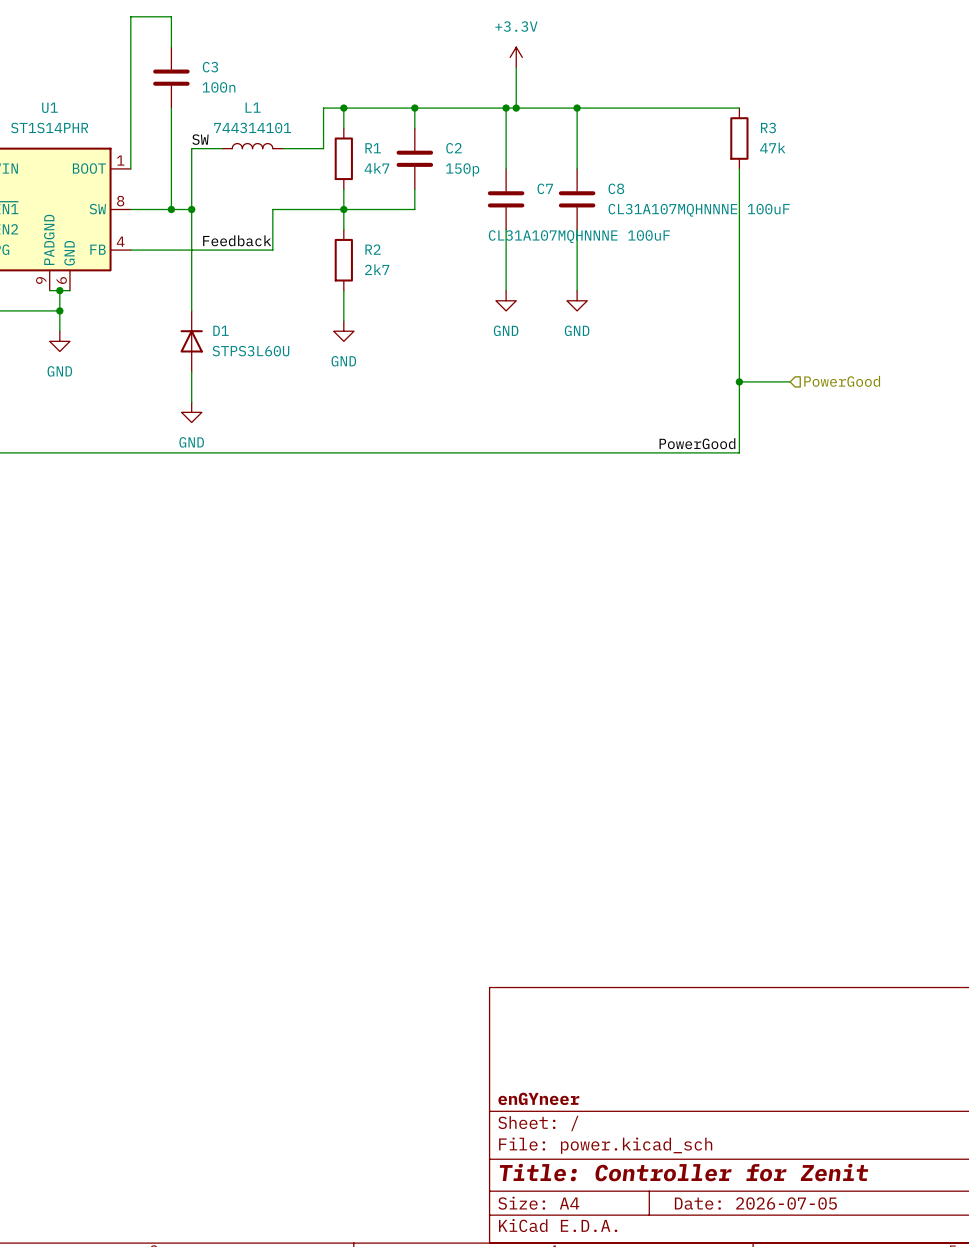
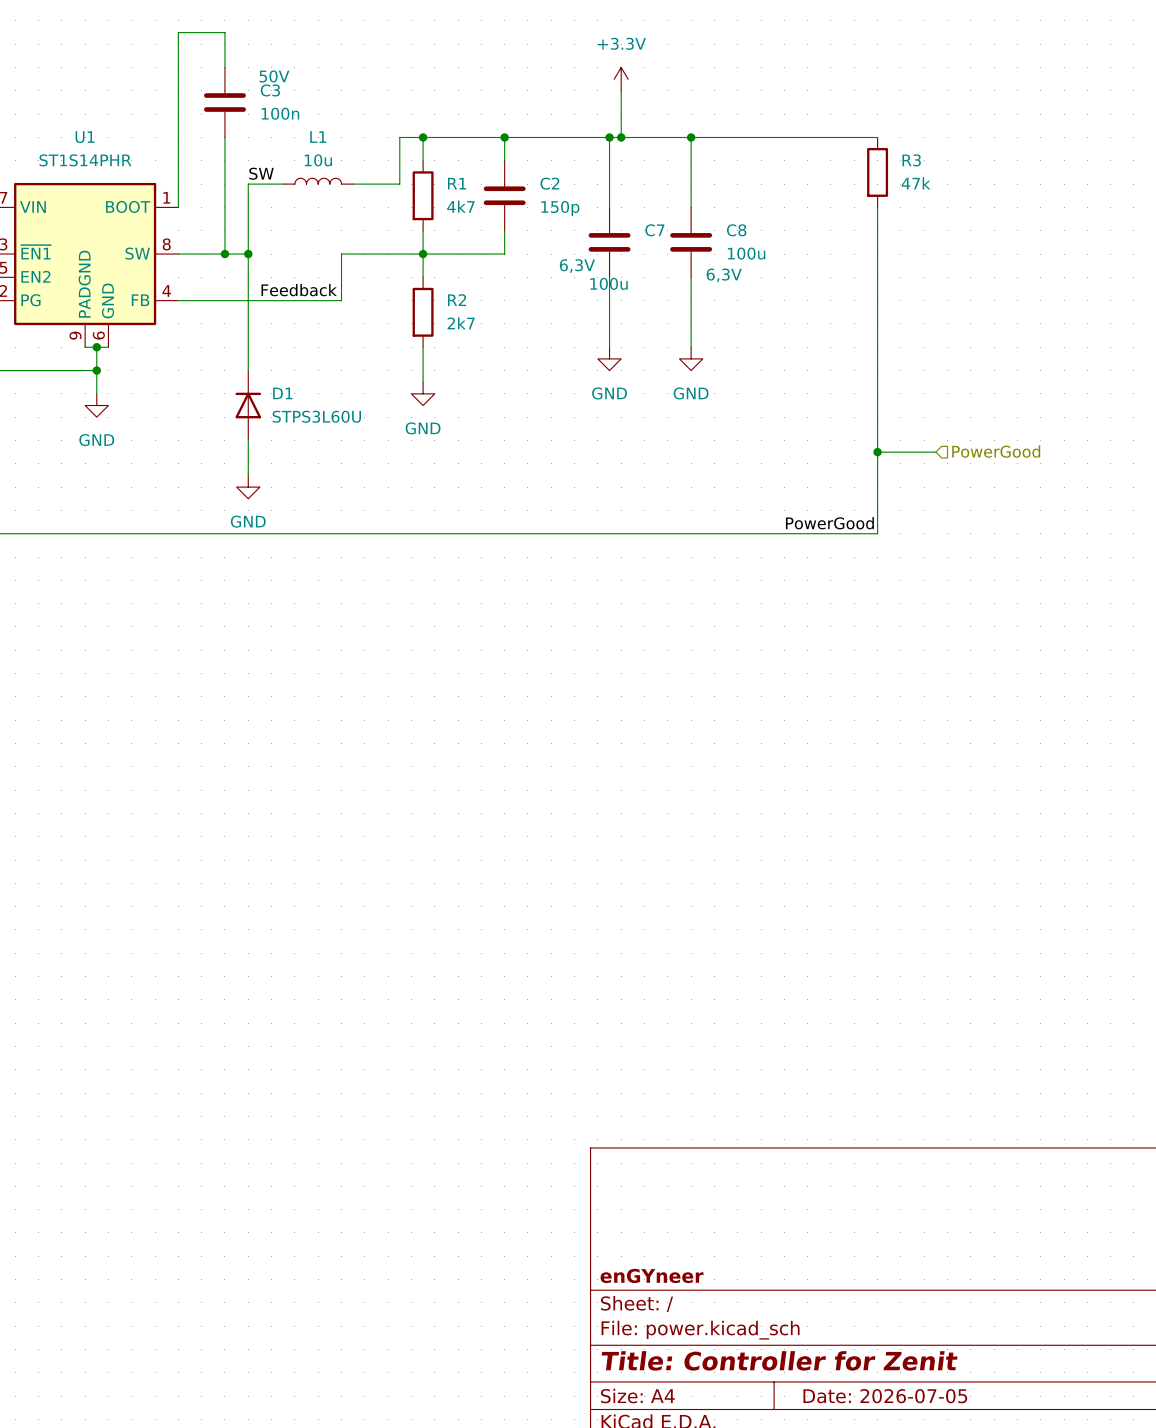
C3 text: none -> 50V (274, 76)
L1 value: 744314101 (252, 127) -> 10u (318, 160)
C8 value: CL31A107MQHNNNE 100uF (699, 210) -> 100u (746, 253)
C7 text: none -> 6,3V (577, 266)
C8 text: none -> 6,3V (724, 275)
C7 value: CL31A107MQHNNNE 100uF (579, 236) -> 100u (609, 283)

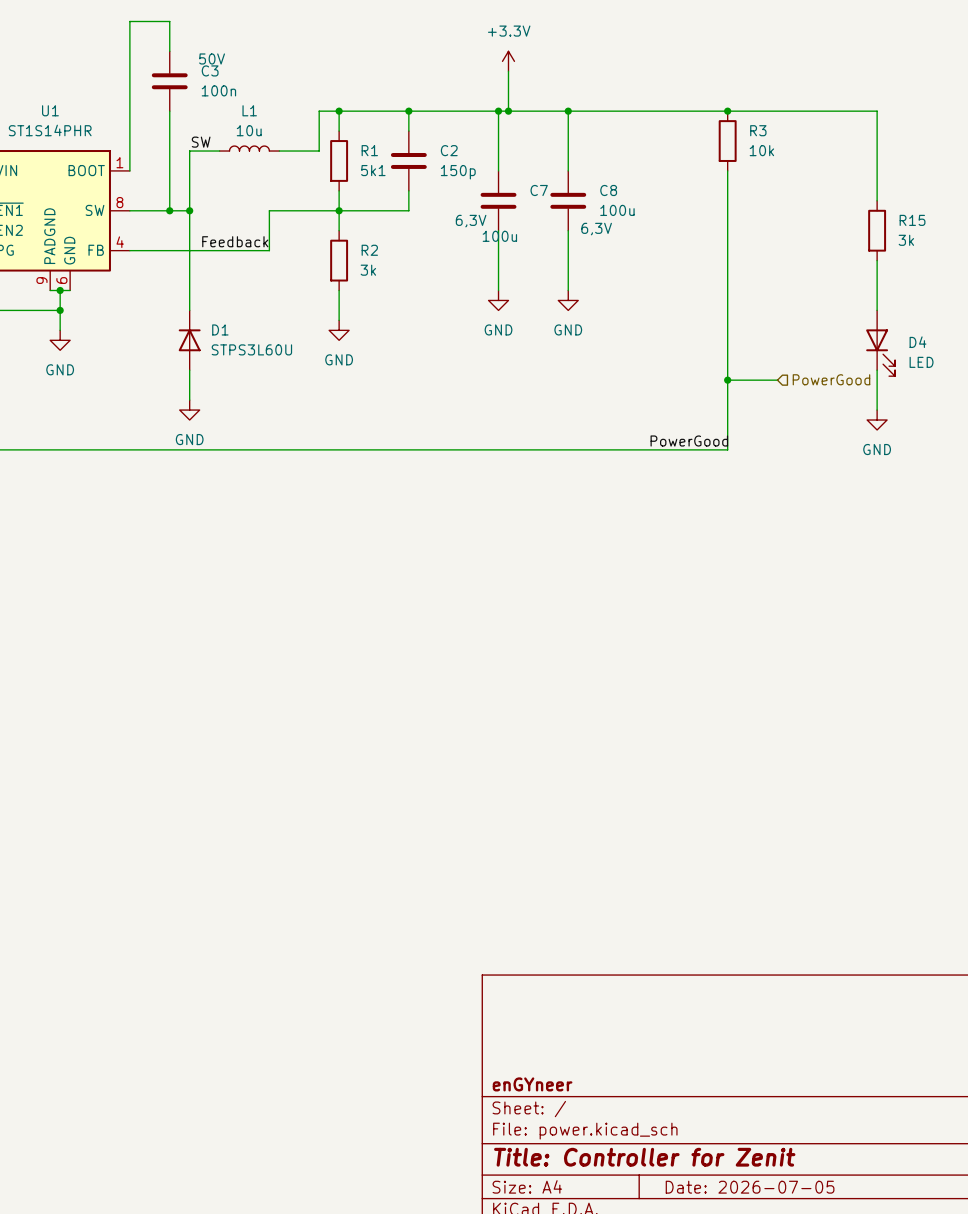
wire: none -> (727, 111) (877, 111) (877, 200)
junction: none -> (727, 111)
R3 value: 47k (916, 183) -> 10k (761, 150)
R1 value: 4k7 (460, 206) -> 5k1 (373, 170)
R15: none -> 3k (877, 230)
wire: none -> (877, 260) (877, 310)
R2 value: 2k7 (461, 323) -> 3k (368, 270)
D4: none -> LED (880, 343)
wire: none -> (877, 370) (877, 410)
power symbol: none -> GND (877, 420)

